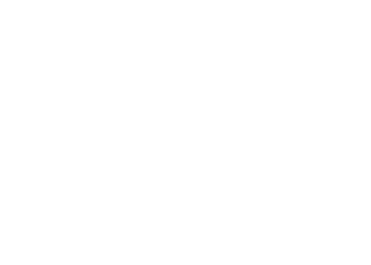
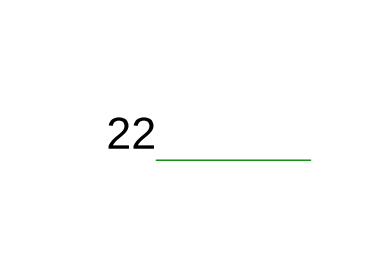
label: none -> 22 (131, 133)
wire: none -> (156, 160) (310, 160)

